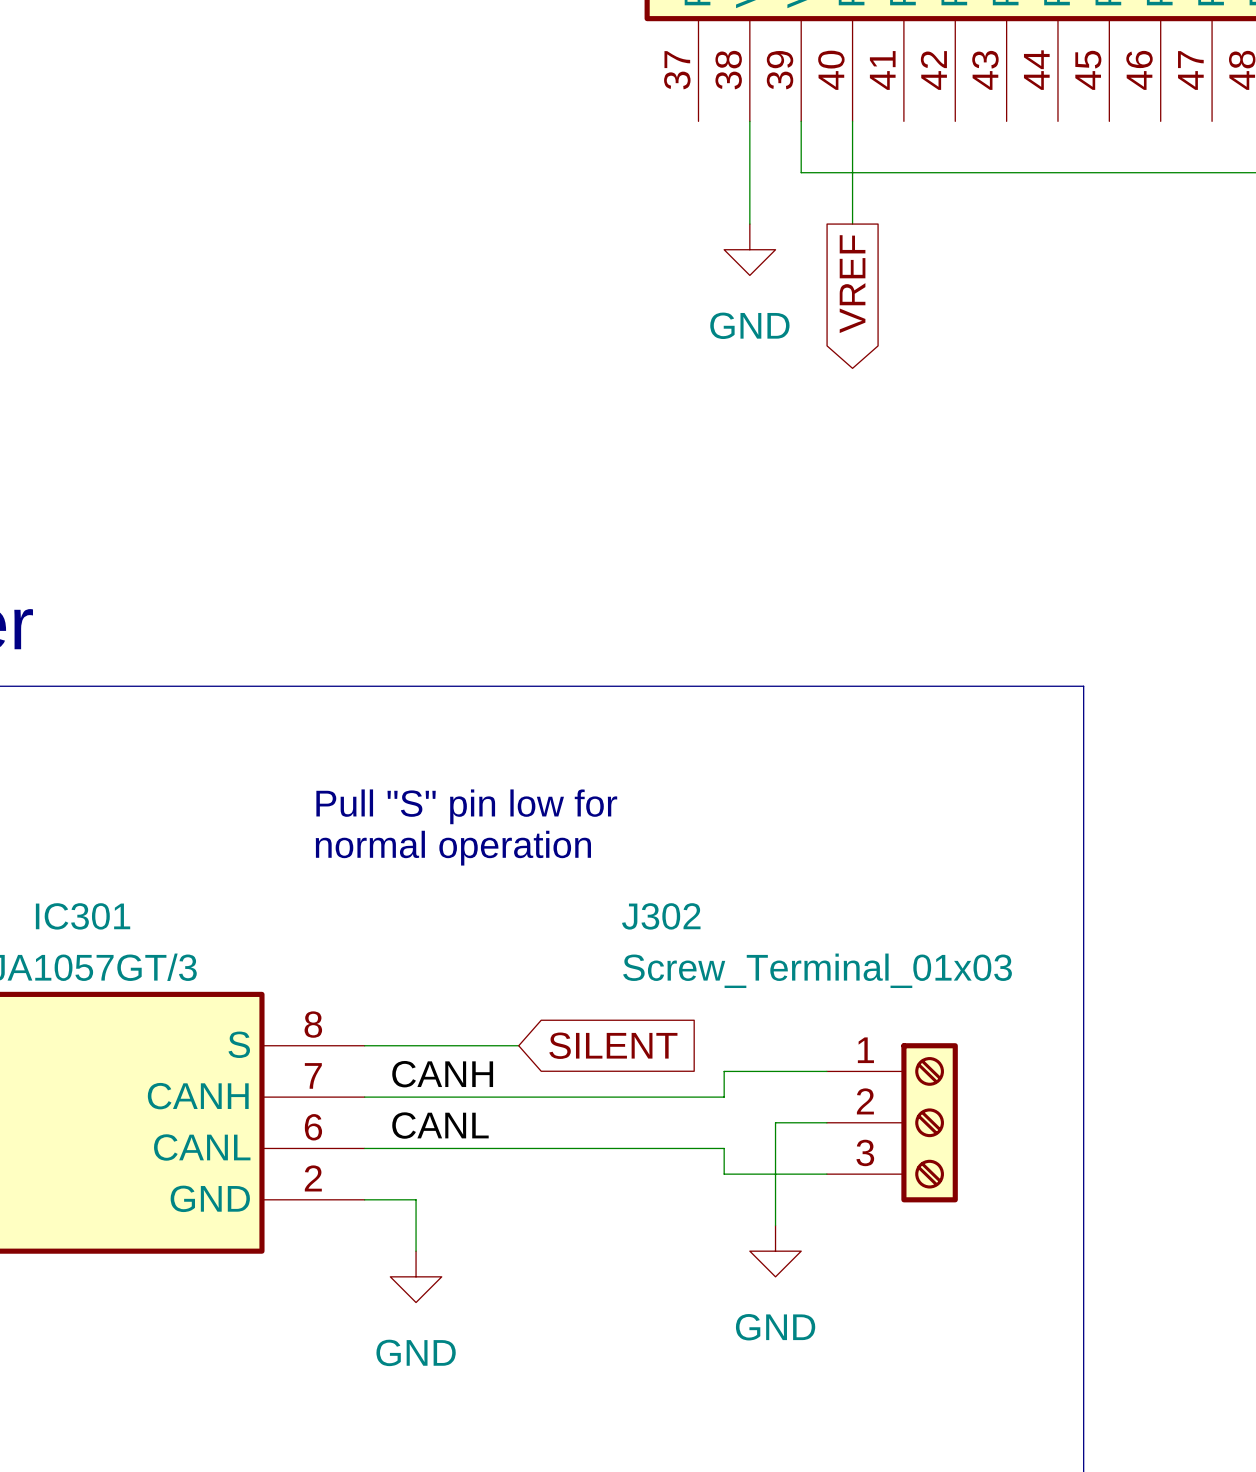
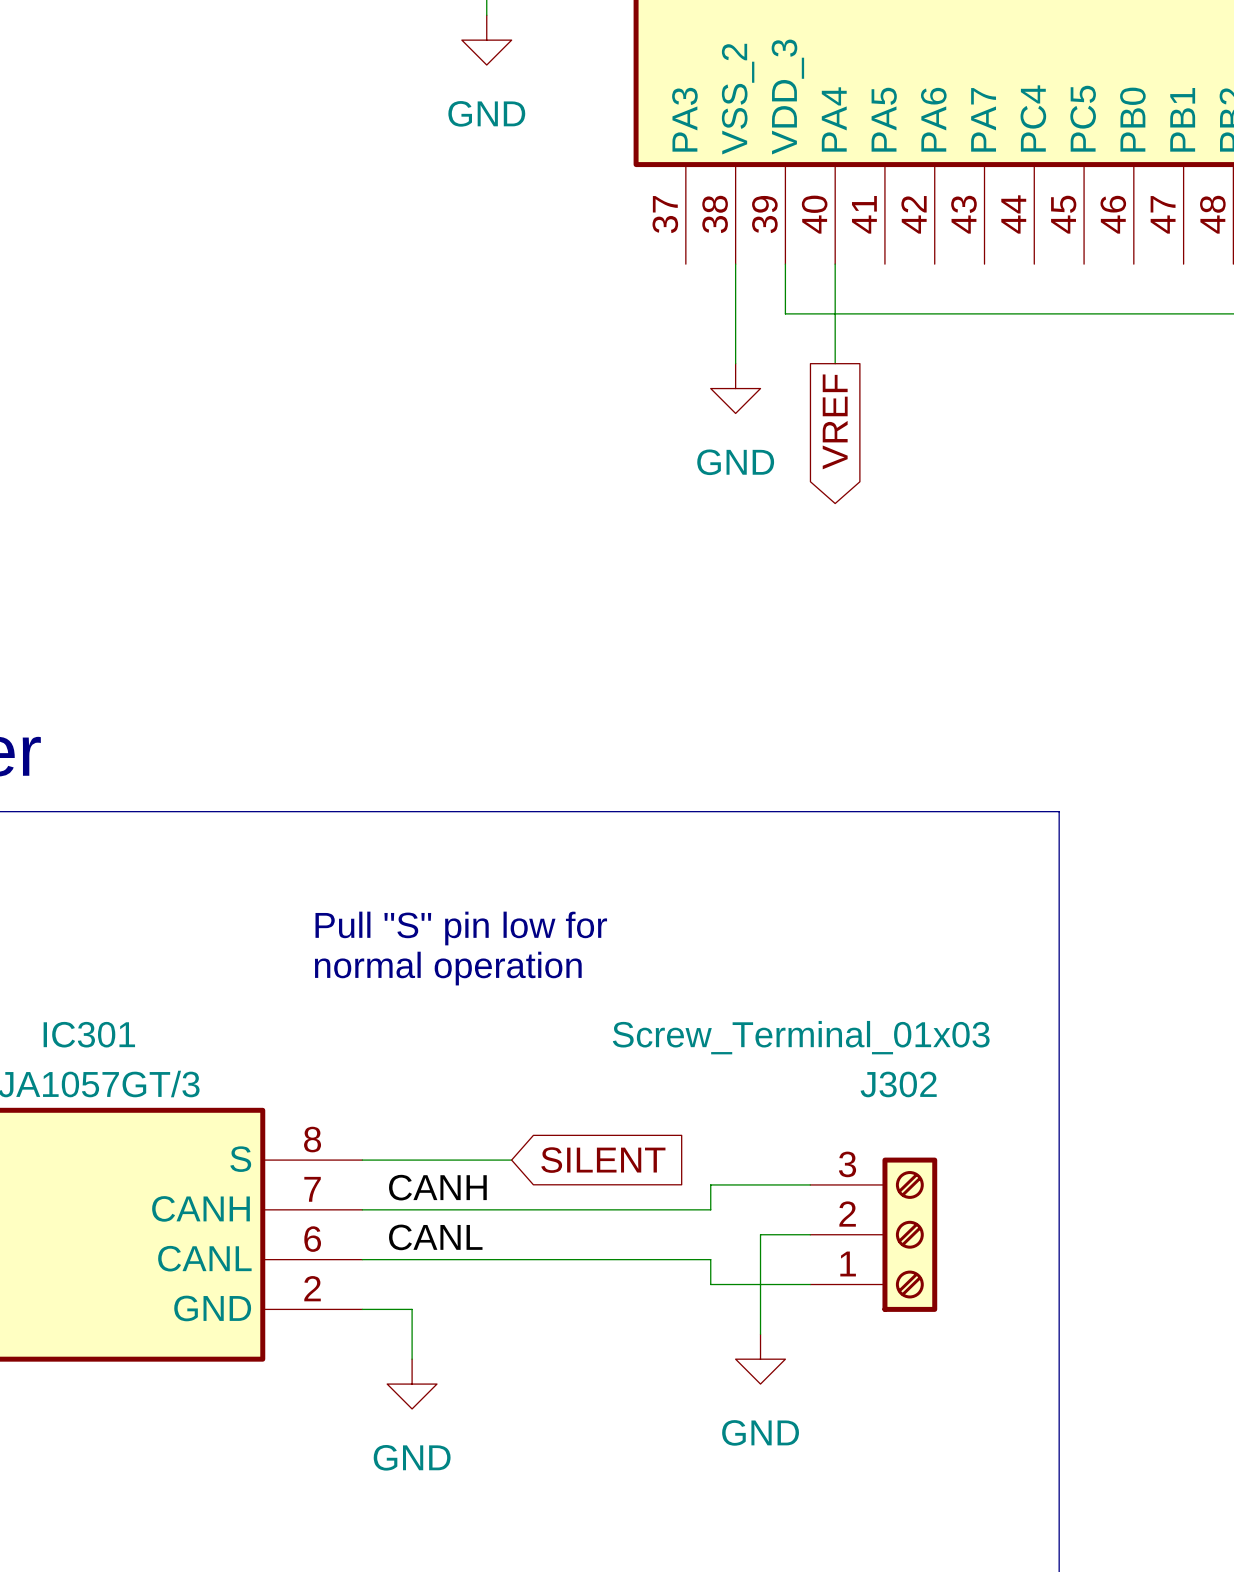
J302 name position: J302 (661, 916) -> J302 (898, 1084)
J302 value position: Screw_Terminal_01x03 (817, 970) -> Screw_Terminal_01x03 (801, 1037)
J302 flip: as is (929, 1122) -> up-down (909, 1234)

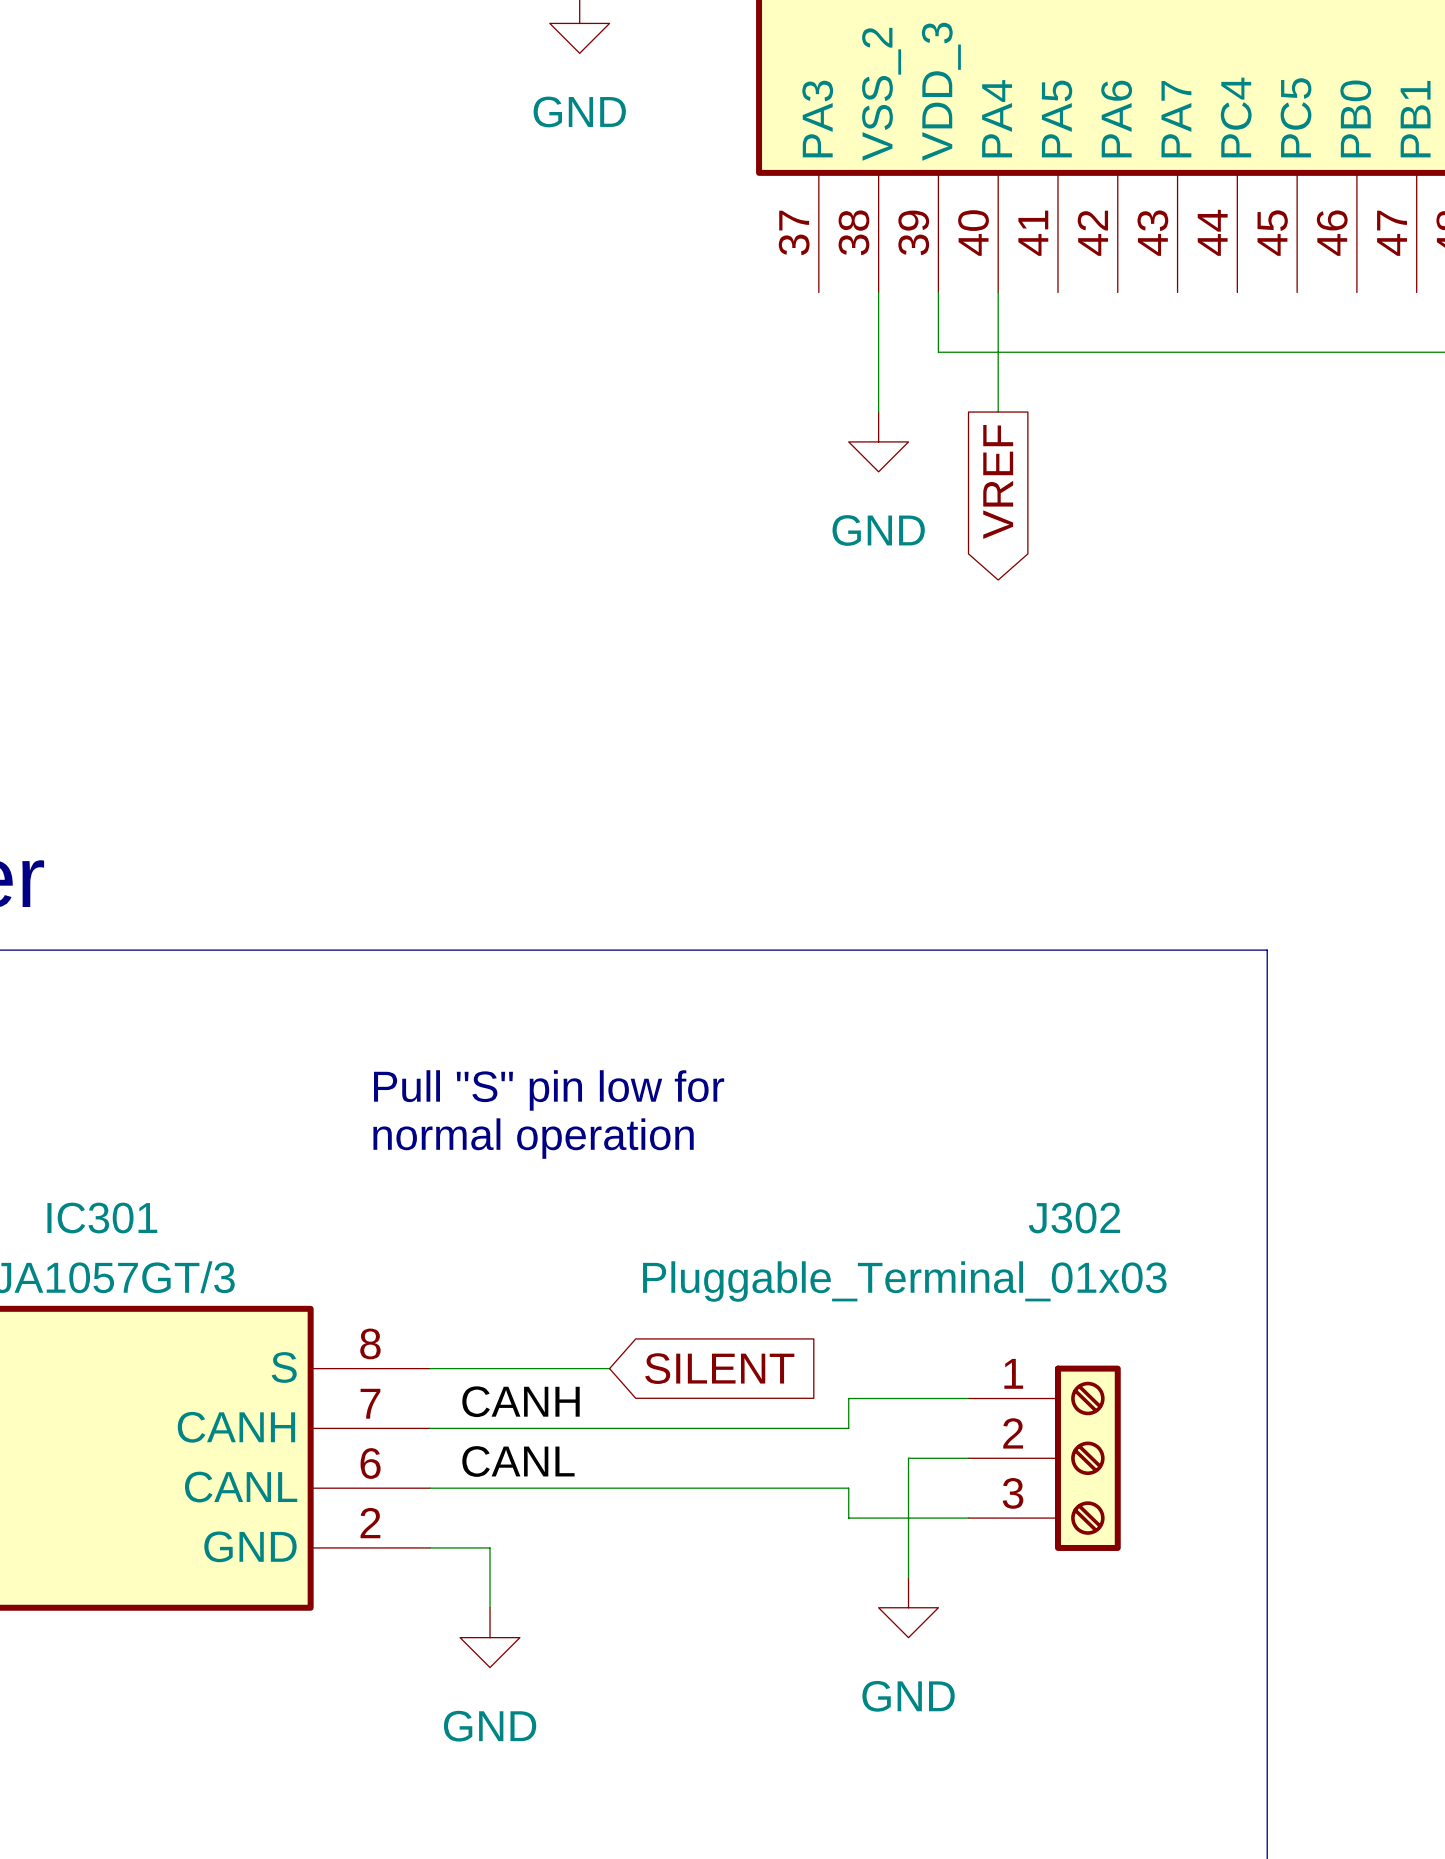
J302 value: Screw_Terminal_01x03 (801, 1037) -> Pluggable_Terminal_01x03 (904, 1281)
J302 name position: J302 (898, 1084) -> J302 (1074, 1218)
J302 flip: as is (909, 1234) -> up-down (1087, 1458)

